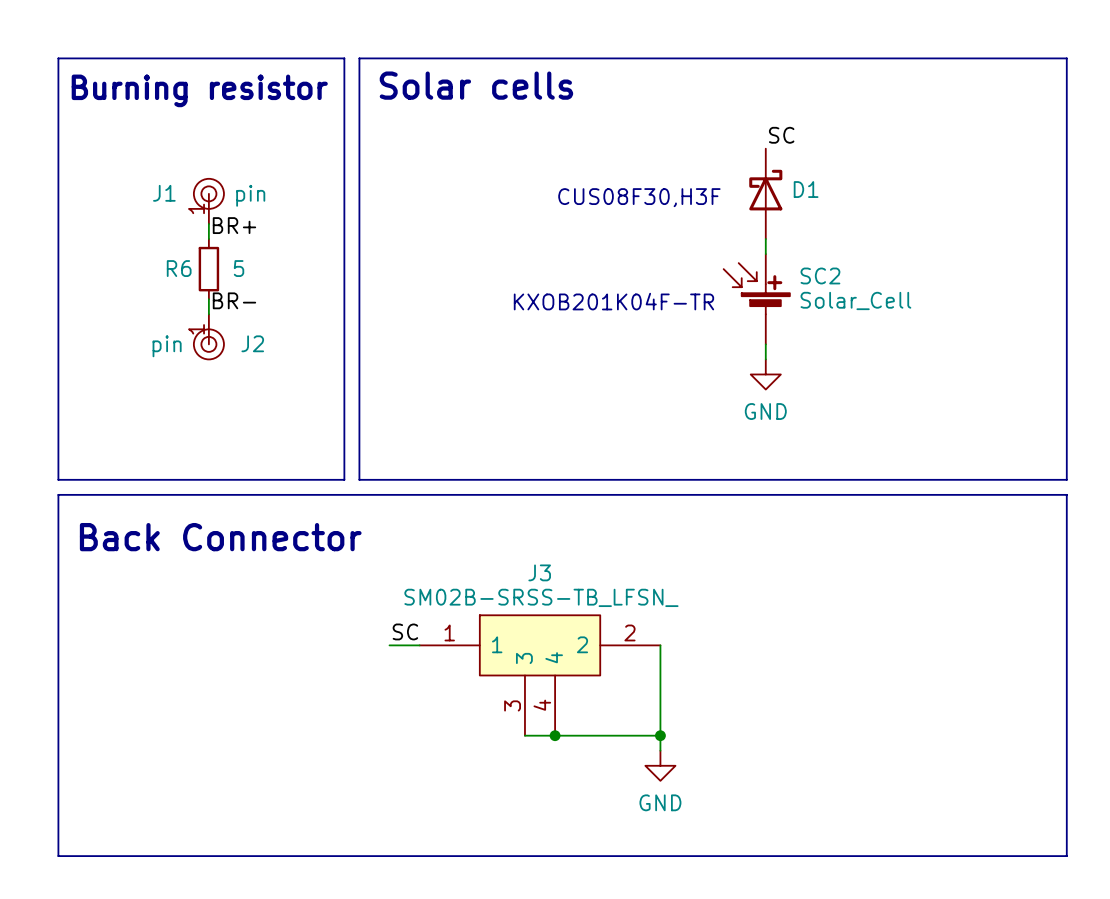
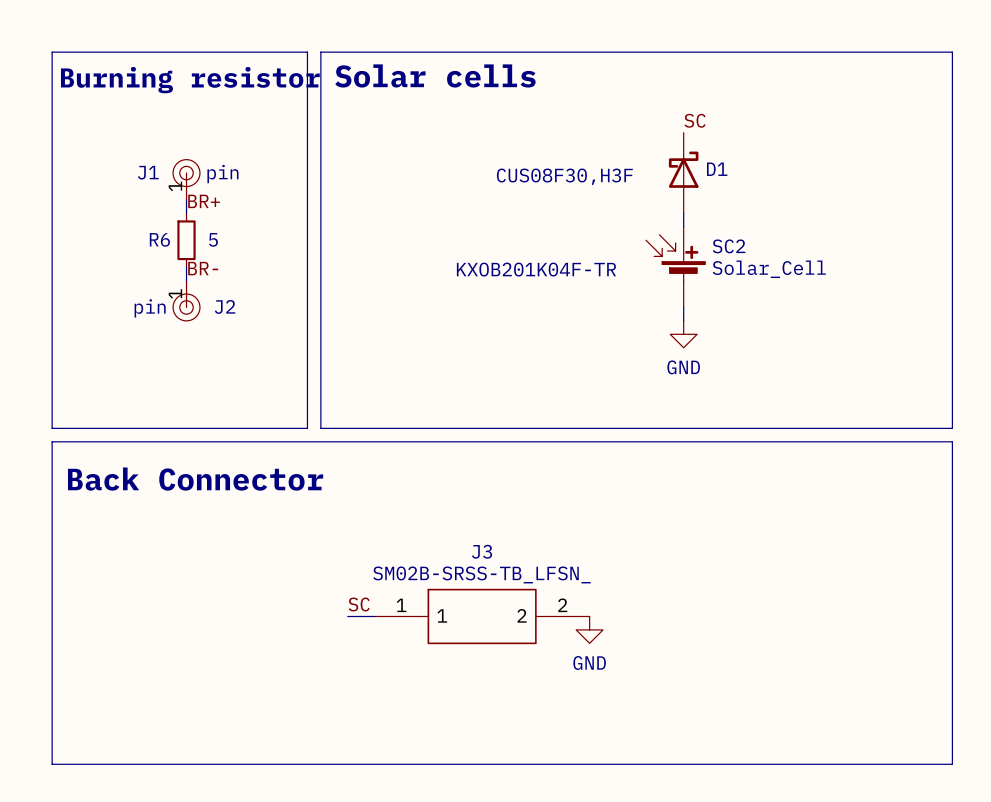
J3 name position: J3 (539, 572) -> J3 (482, 551)
J3 value position: SM02B-SRSS-TB_LFSN_ (541, 597) -> SM02B-SRSS-TB_LFSN_ (481, 574)
J3 symbol: [419, 614, 661, 736] -> [374, 588, 590, 645]
label position: SC (405, 631) -> SC (359, 604)
wire: (389, 645) (419, 645) -> (347, 616) (374, 616)
wire: (660, 645) (660, 750) -> none
wire: (524, 735) (660, 735) -> none
junction: (555, 735) -> none
junction: (660, 735) -> none
power symbol position: GND (660, 765) -> GND (589, 629)

